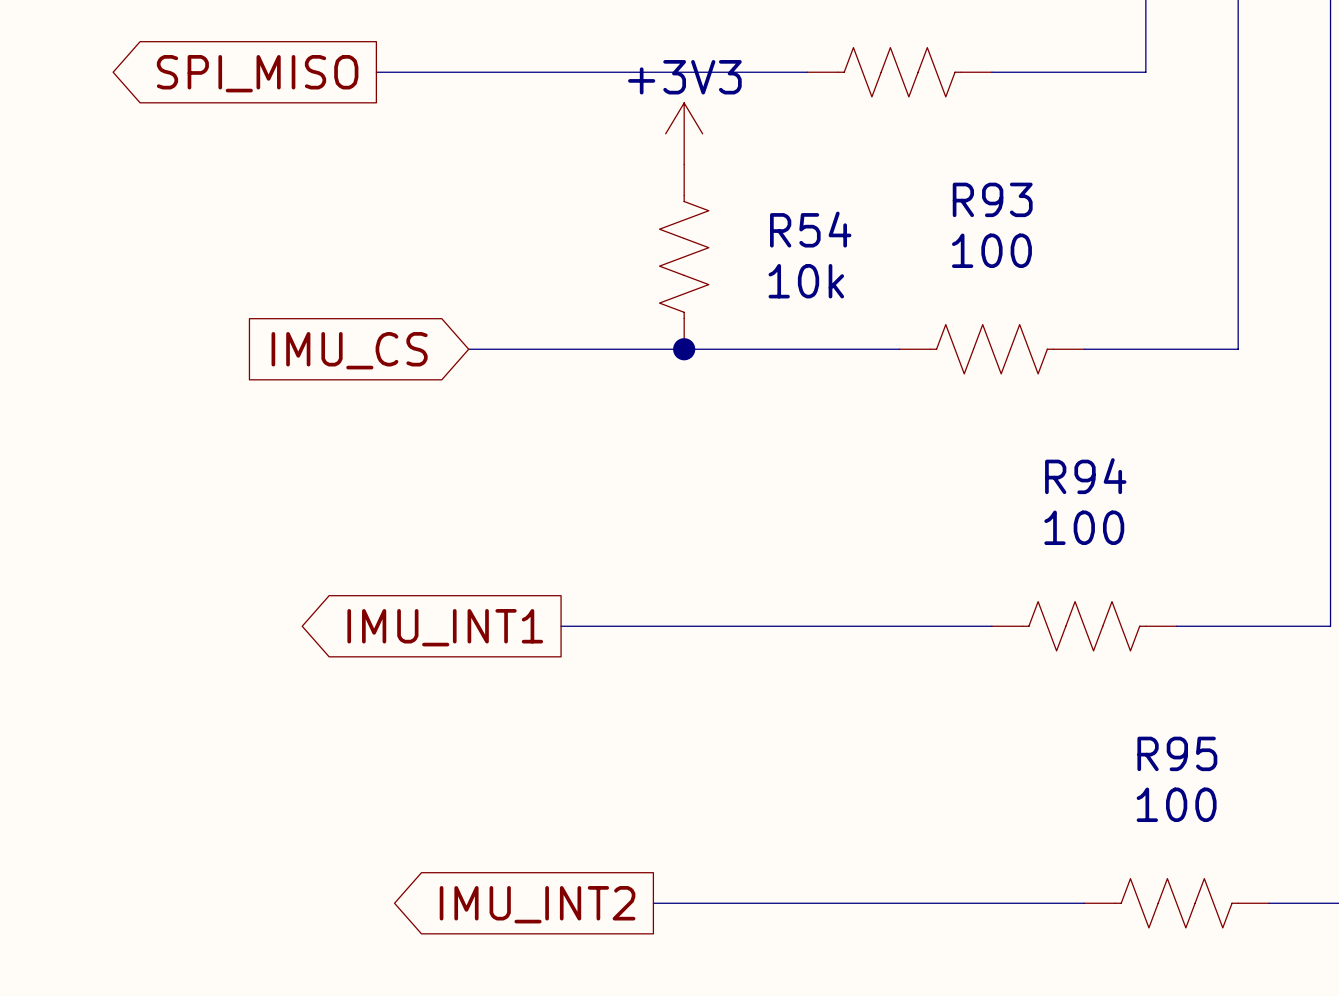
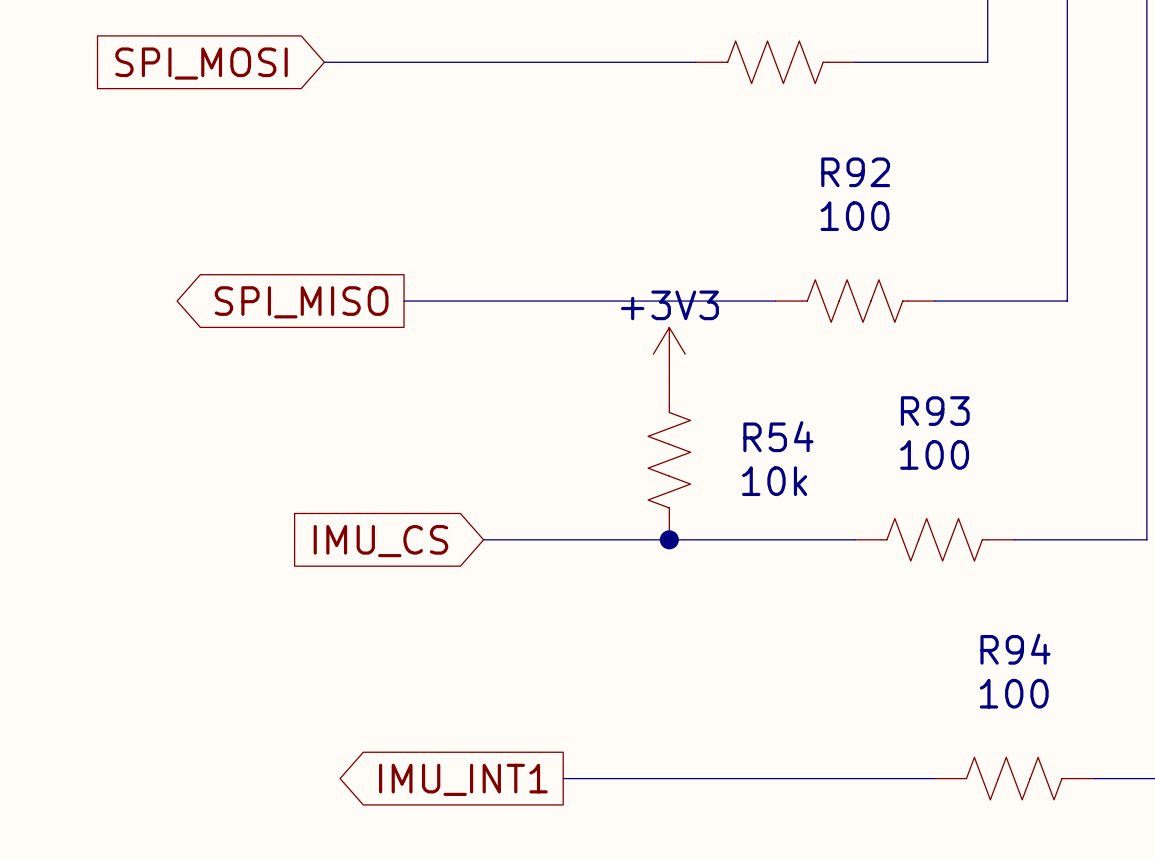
global label shape: output (257, 73) -> input (201, 63)
global label: SPI_MISO (257, 73) -> SPI_MOSI (201, 63)
power symbol position: +3V3 (684, 133) -> +3V3 (669, 354)
R93 name: R93 (992, 199) -> R92 (855, 172)
R54 position: (684, 256) -> (669, 460)
junction: (684, 349) -> none
global label shape: input (349, 350) -> output (301, 302)
global label: IMU_CS (349, 350) -> SPI_MISO (301, 302)
R94 name: R94 (1085, 476) -> R93 (935, 411)
junction: none -> (669, 539)
global label shape: output (445, 627) -> input (380, 541)
global label: IMU_INT1 (445, 627) -> IMU_CS (380, 541)
R95 name: R95 (1177, 753) -> R94 (1015, 649)
global label: IMU_INT2 (537, 904) -> IMU_INT1 (463, 779)

